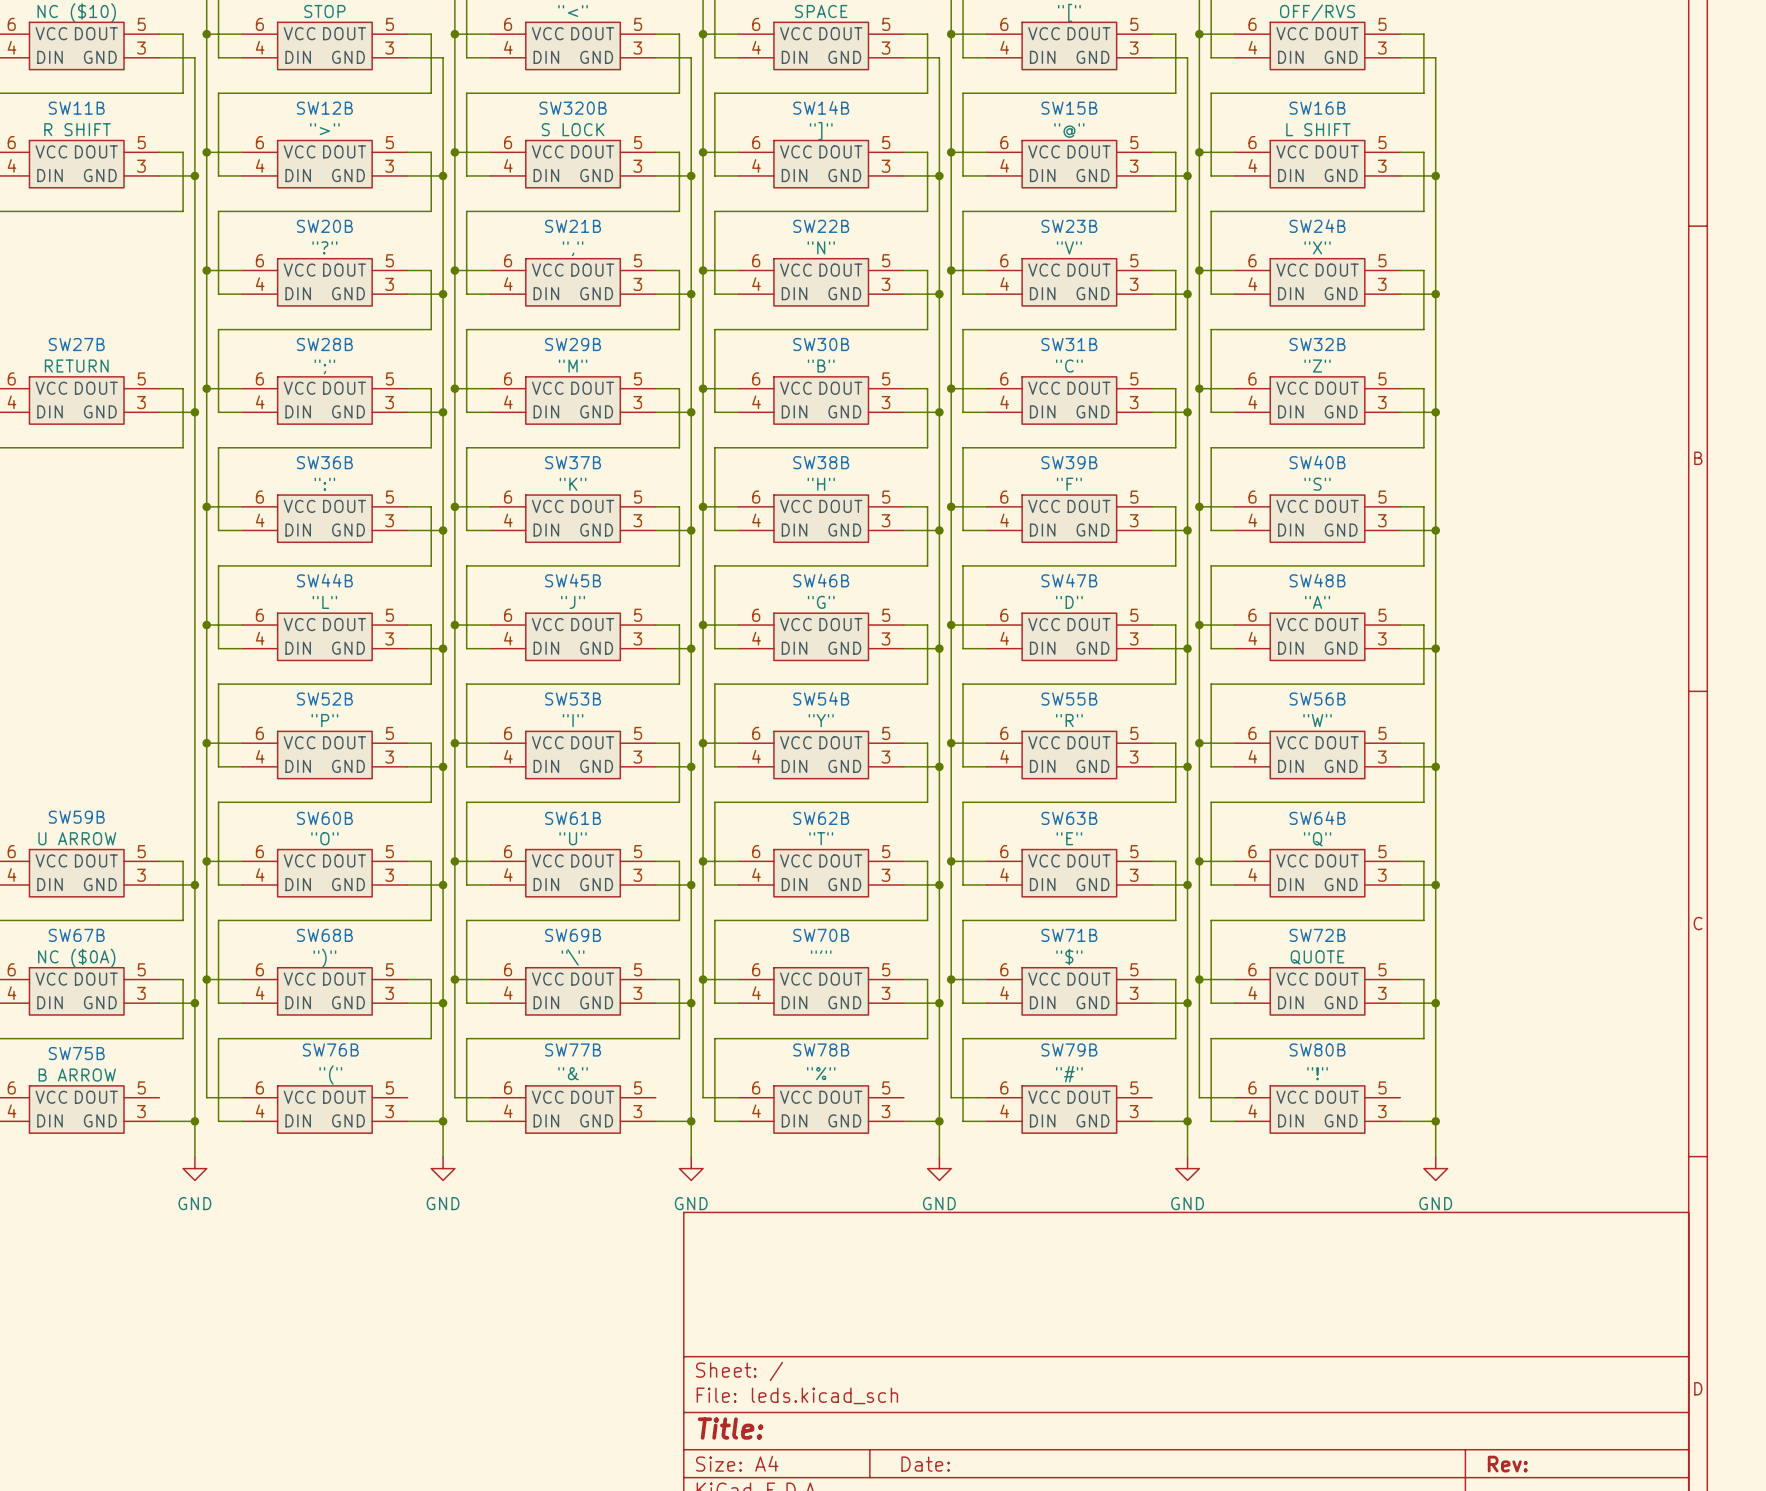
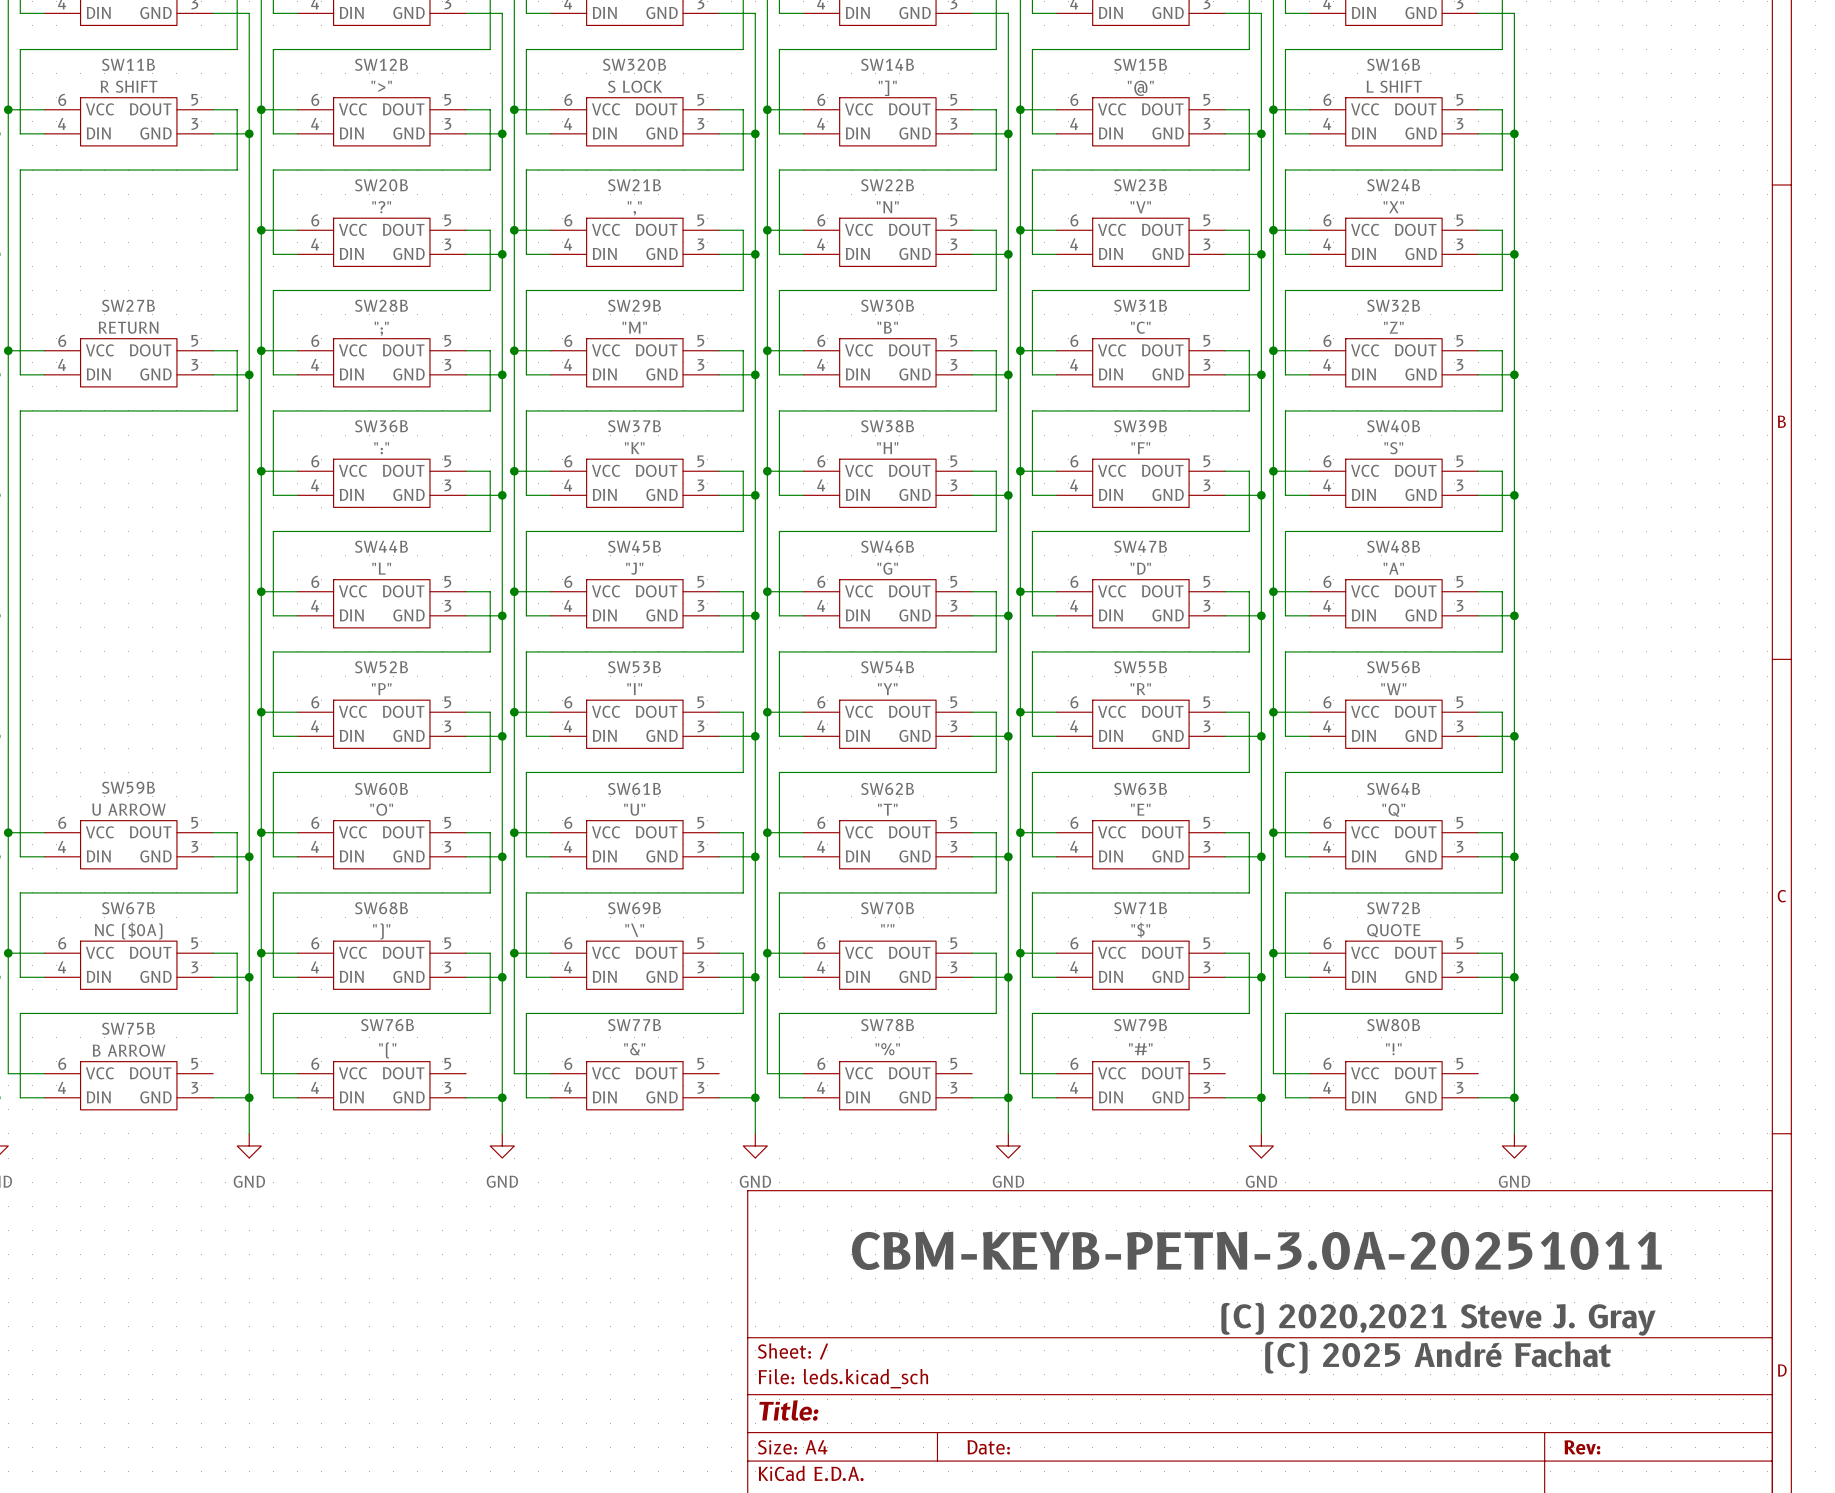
text: none -> CBM-KEYB-PETN-3.0A-20251011 (1256, 1250)
text: none -> (C) 2020,2021 Steve J. Gray (1438, 1319)
text: none -> (C) 2025 André Fachat (1438, 1357)

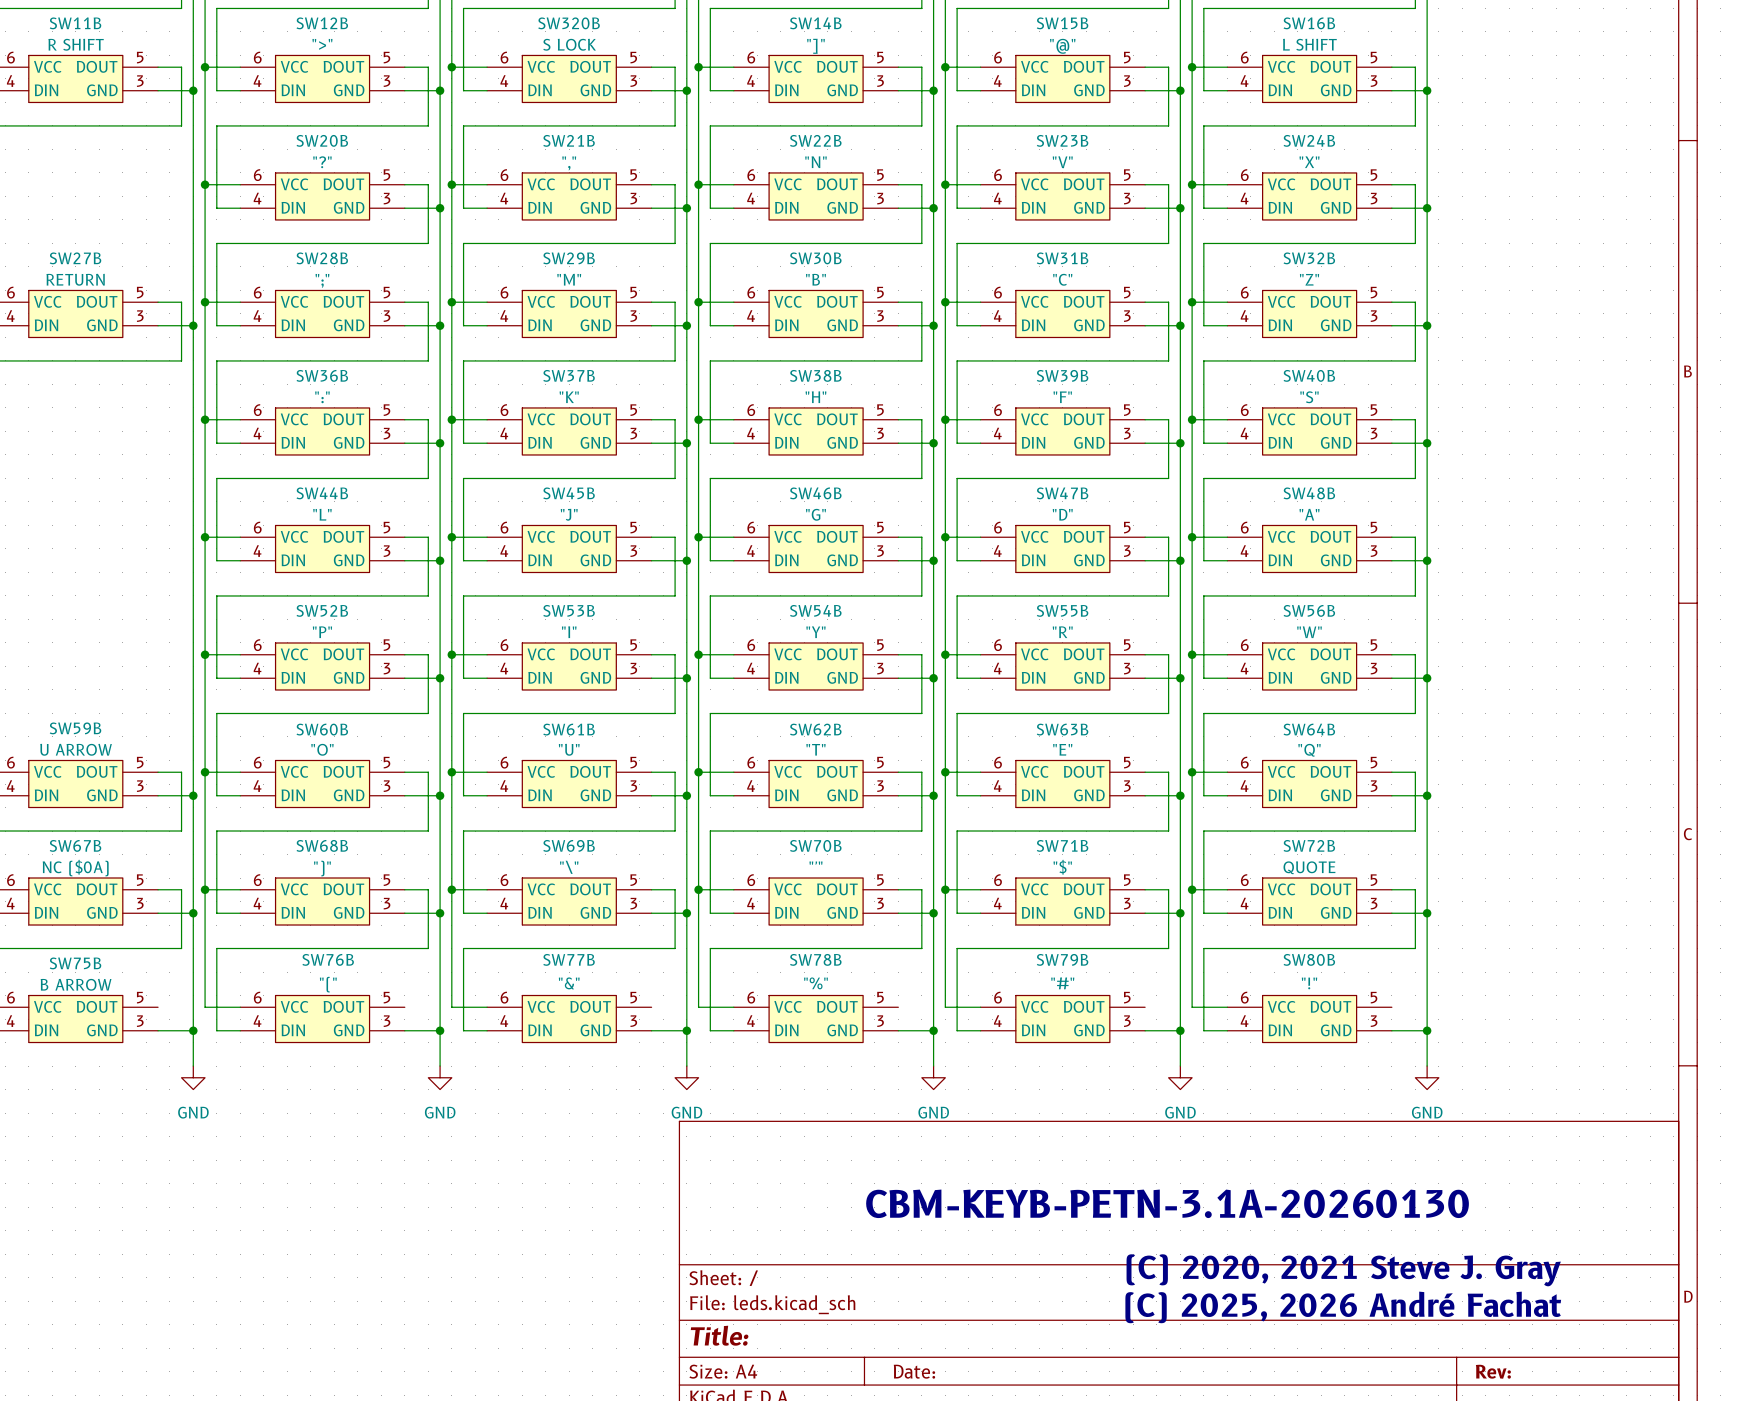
text: CBM-KEYB-PETN-3.0A-20251011 (1256, 1250) -> CBM-KEYB-PETN-3.1A-20260130 (1167, 1203)
text: (C) 2020,2021 Steve J. Gray (1438, 1319) -> (C) 2020, 2021 Steve J. Gray (1343, 1270)
text: (C) 2025 André Fachat (1438, 1357) -> (C) 2025, 2026 André Fachat (1343, 1307)

